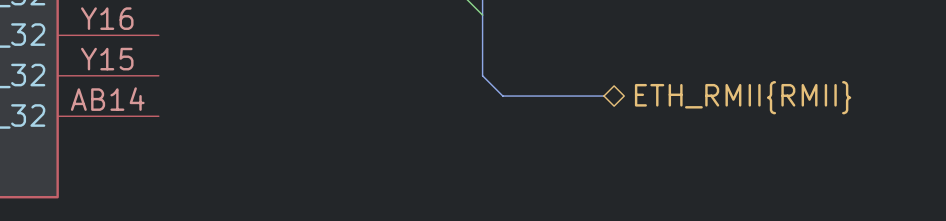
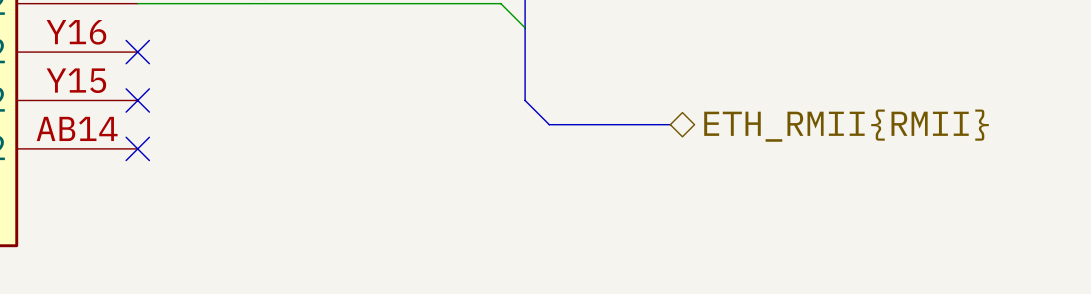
no-connect mark: none -> (137, 52)
no-connect mark: none -> (137, 100)
no-connect mark: none -> (137, 148)

